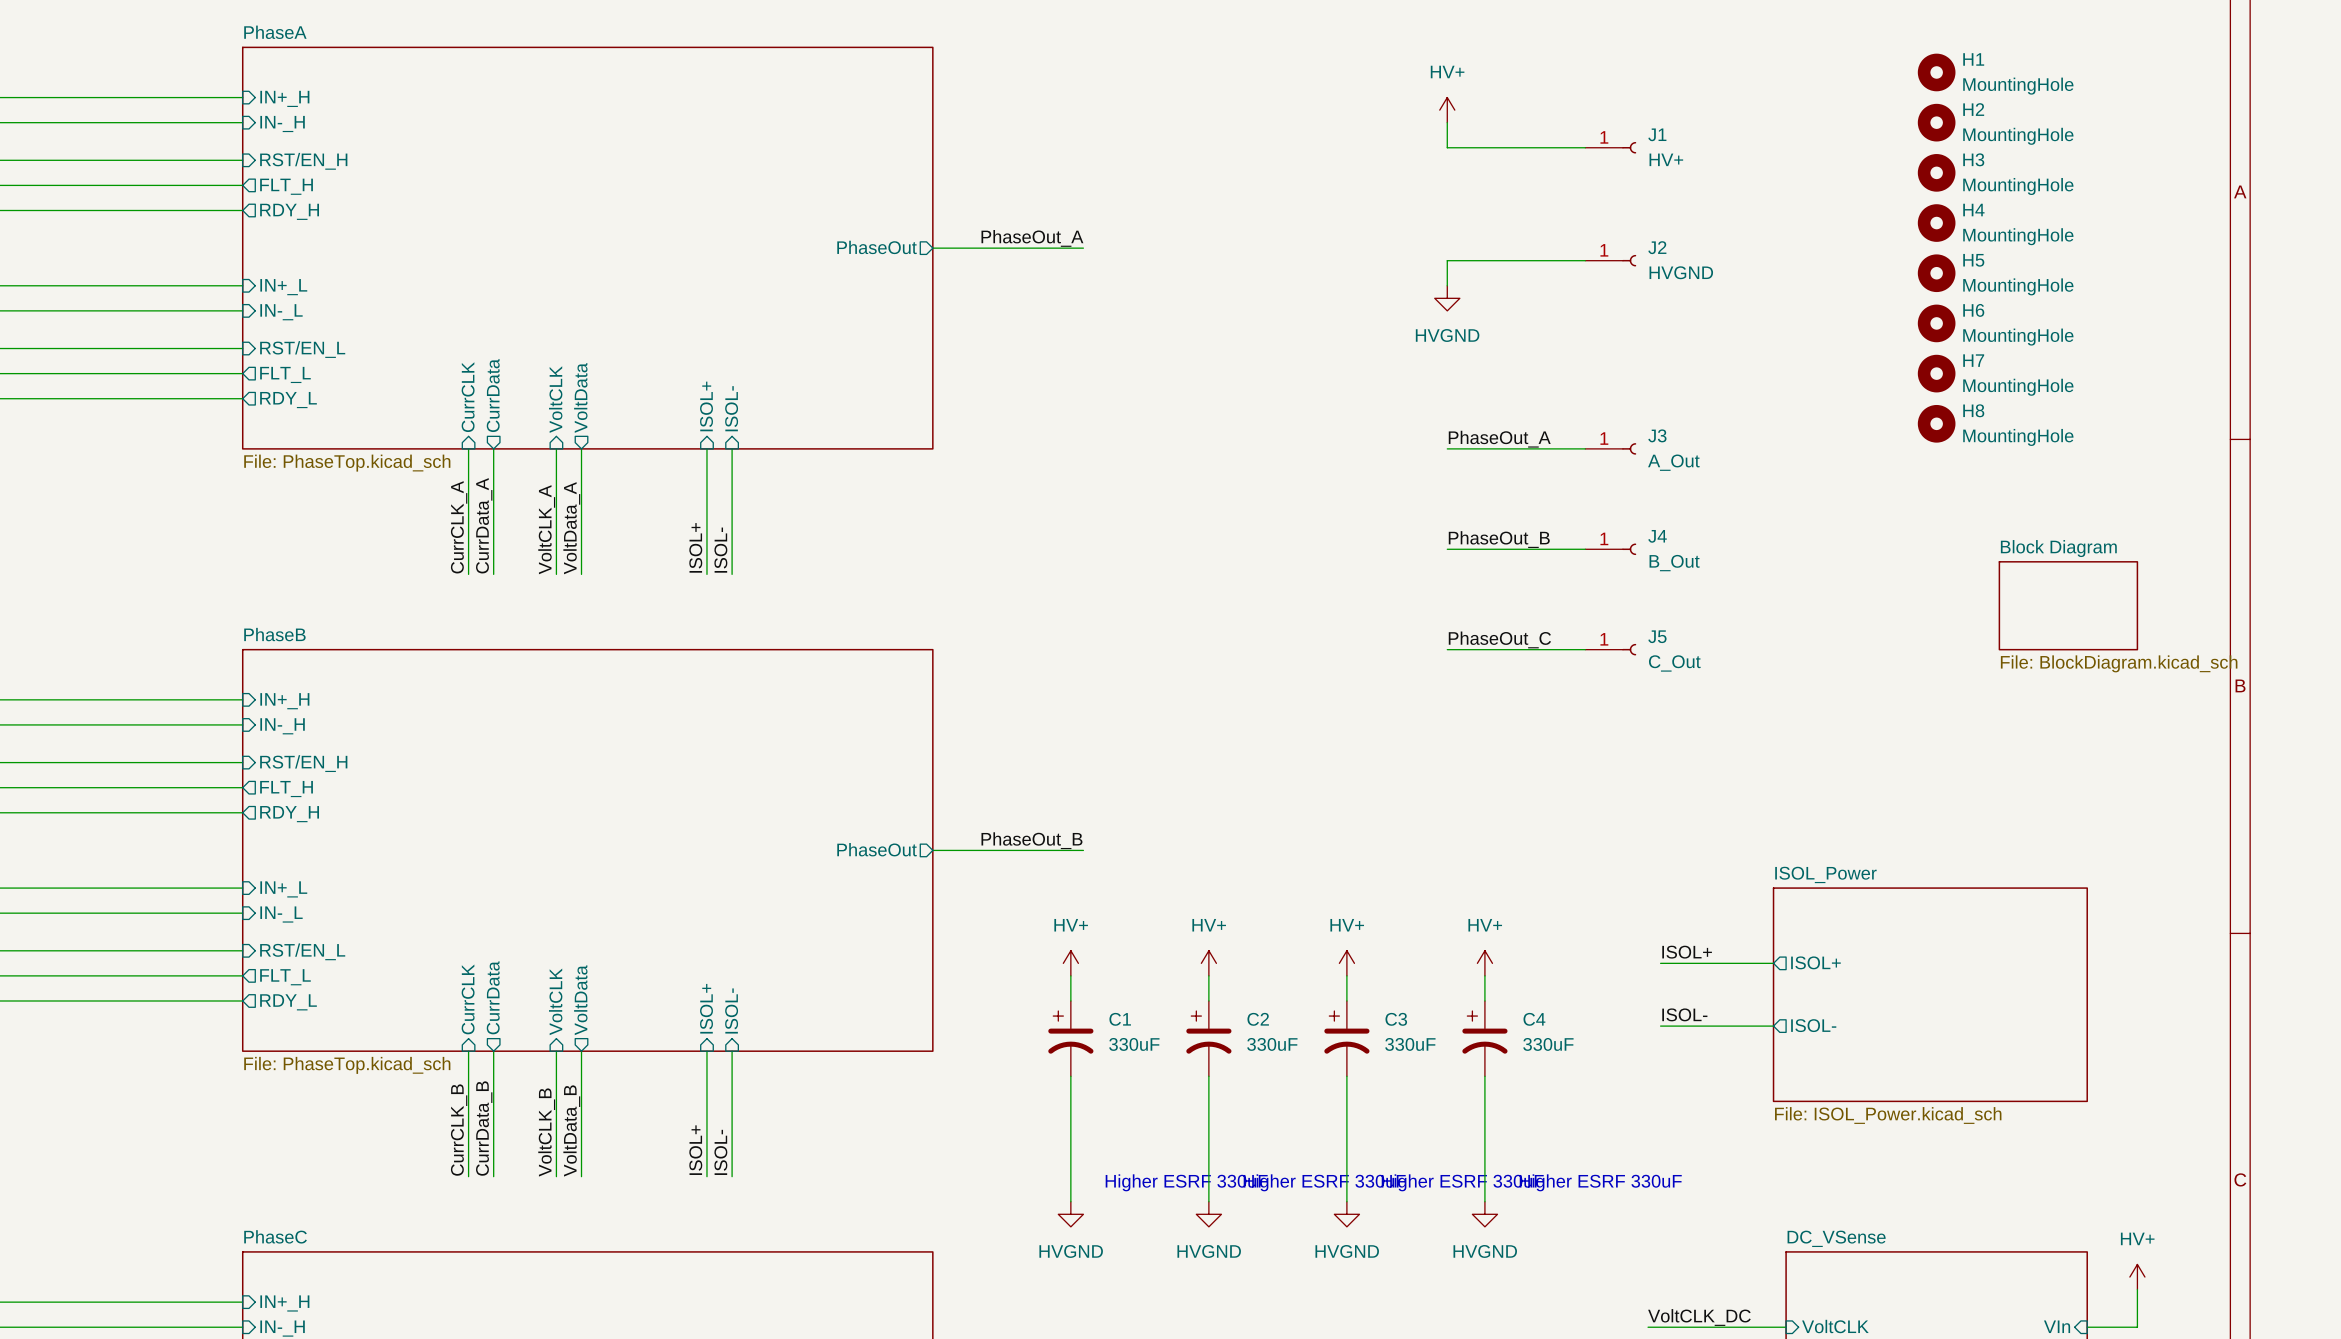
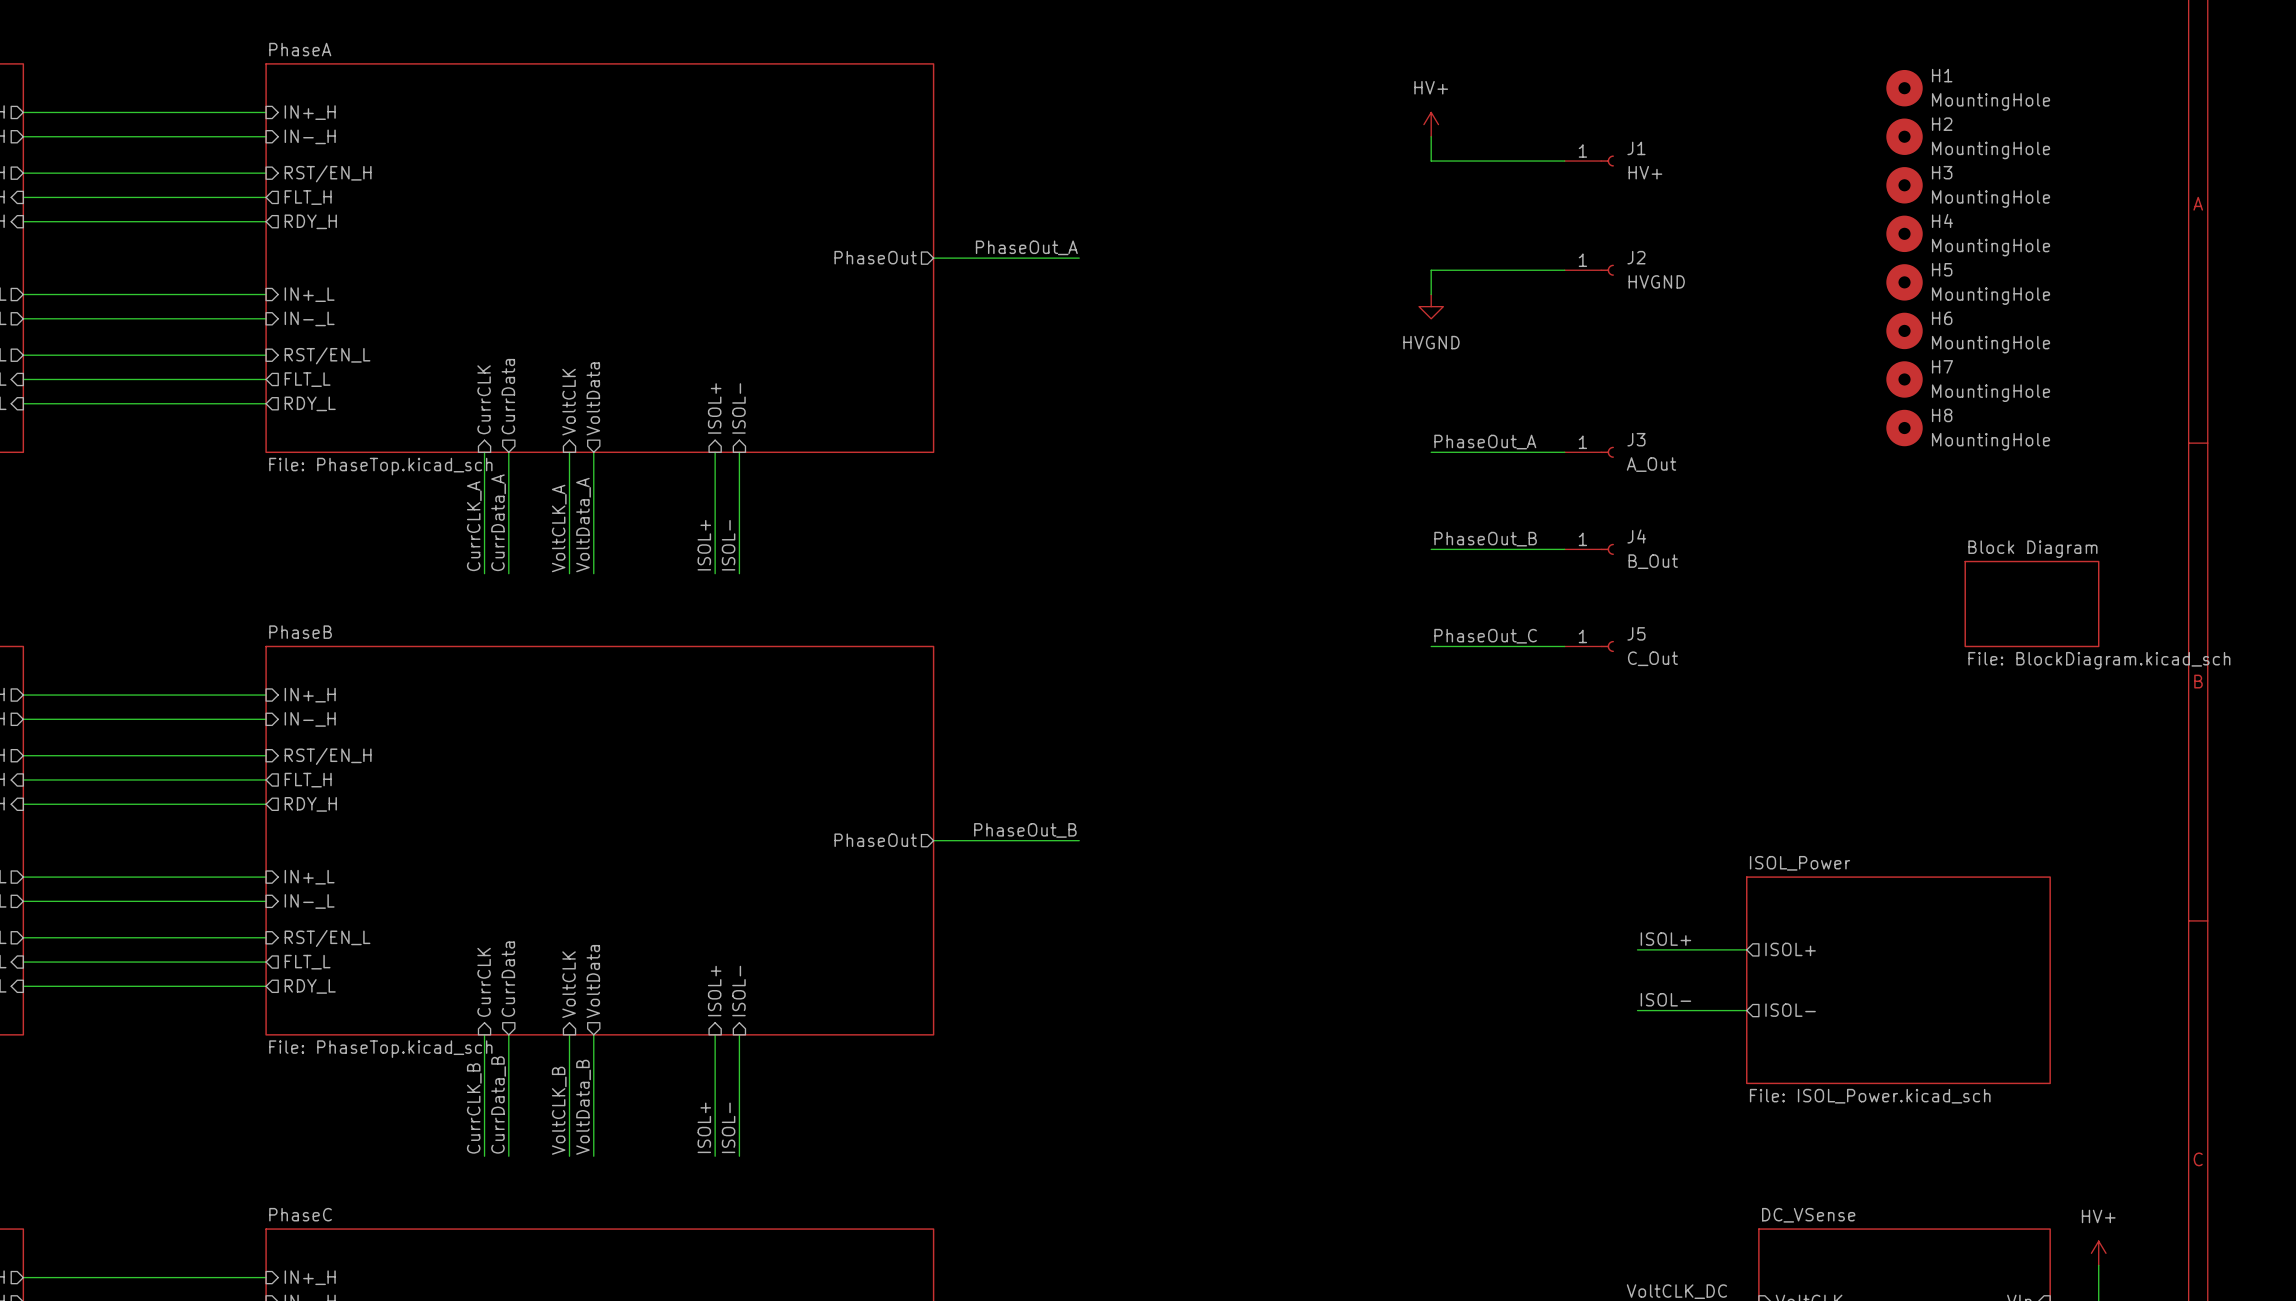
power symbol: HV+ (1070, 963) -> none
power symbol: HV+ (1208, 963) -> none
power symbol: HV+ (1346, 963) -> none
power symbol: HV+ (1484, 963) -> none
wire: (1070, 975) (1070, 1000) -> none
wire: (1208, 975) (1208, 1000) -> none
wire: (1346, 975) (1346, 1000) -> none
wire: (1484, 975) (1484, 1000) -> none
C1: 330uF (1070, 1038) -> none
C2: 330uF (1208, 1038) -> none
C3: 330uF (1346, 1038) -> none
C4: 330uF (1484, 1038) -> none
wire: (1070, 1076) (1070, 1201) -> none
wire: (1208, 1076) (1208, 1201) -> none
wire: (1346, 1076) (1346, 1201) -> none
wire: (1484, 1076) (1484, 1201) -> none
text: Higher ESRF 330uF (1186, 1182) -> none
text: Higher ESRF 330uF (1324, 1182) -> none
text: Higher ESRF 330uF (1462, 1182) -> none
text: Higher ESRF 330uF (1600, 1182) -> none
power symbol: HVGND (1070, 1214) -> none
power symbol: HVGND (1208, 1214) -> none
power symbol: HVGND (1346, 1214) -> none
power symbol: HVGND (1484, 1214) -> none

